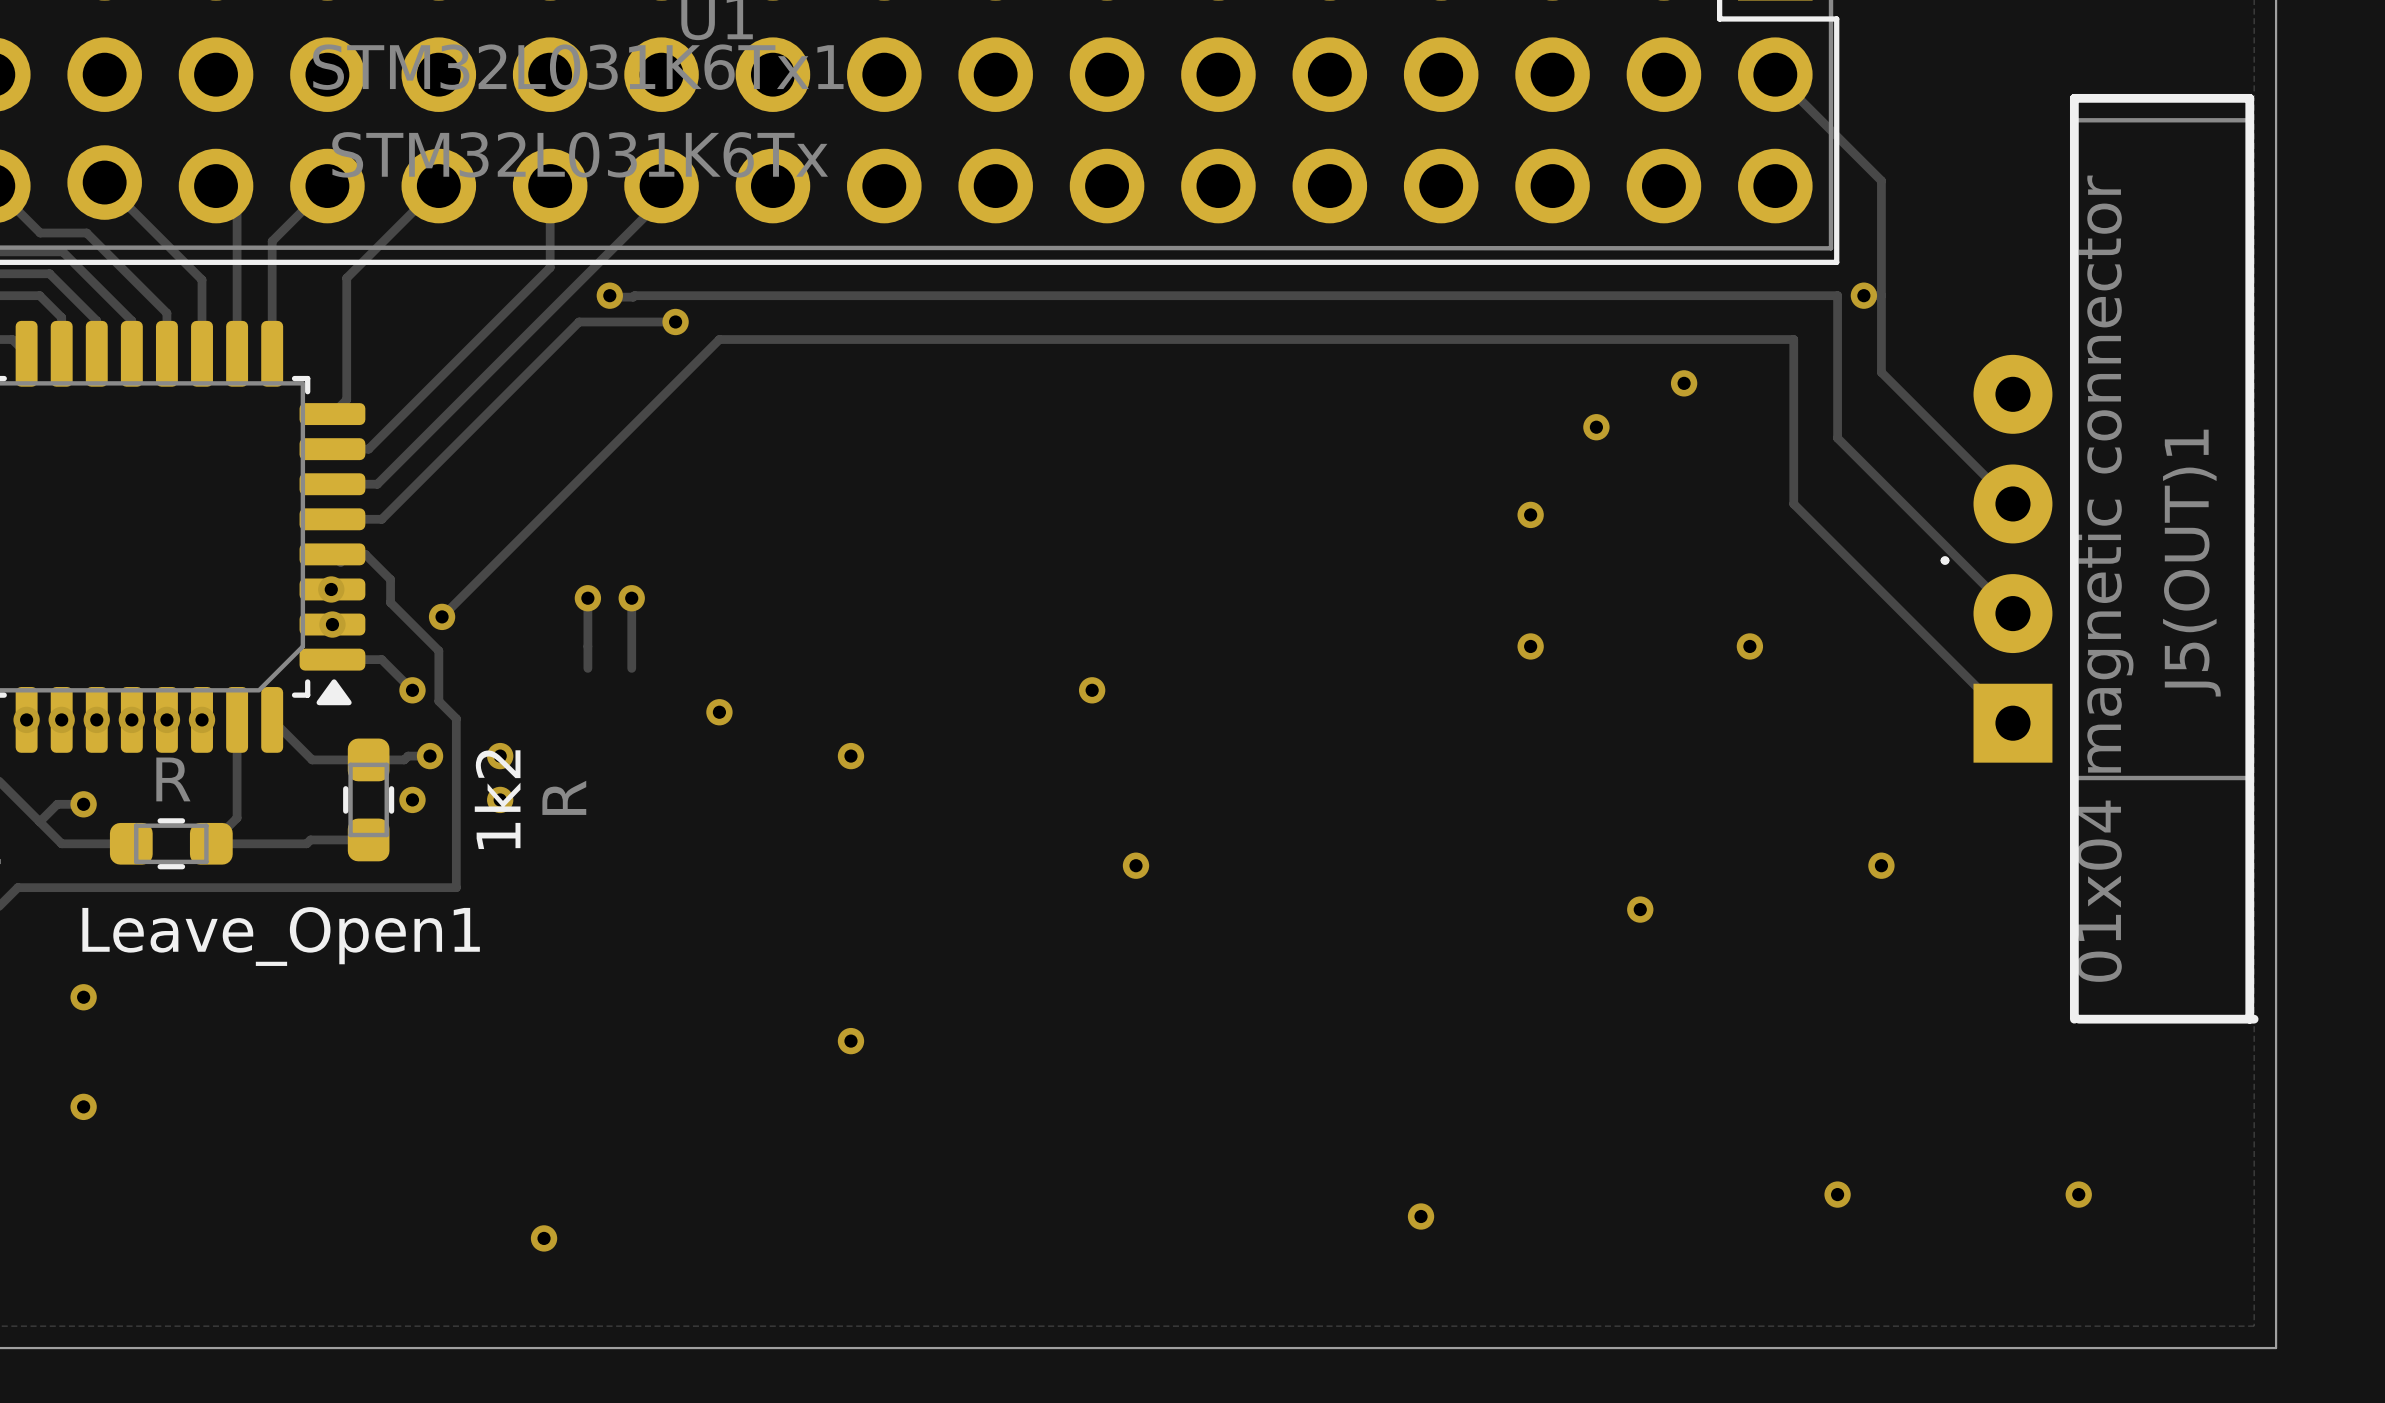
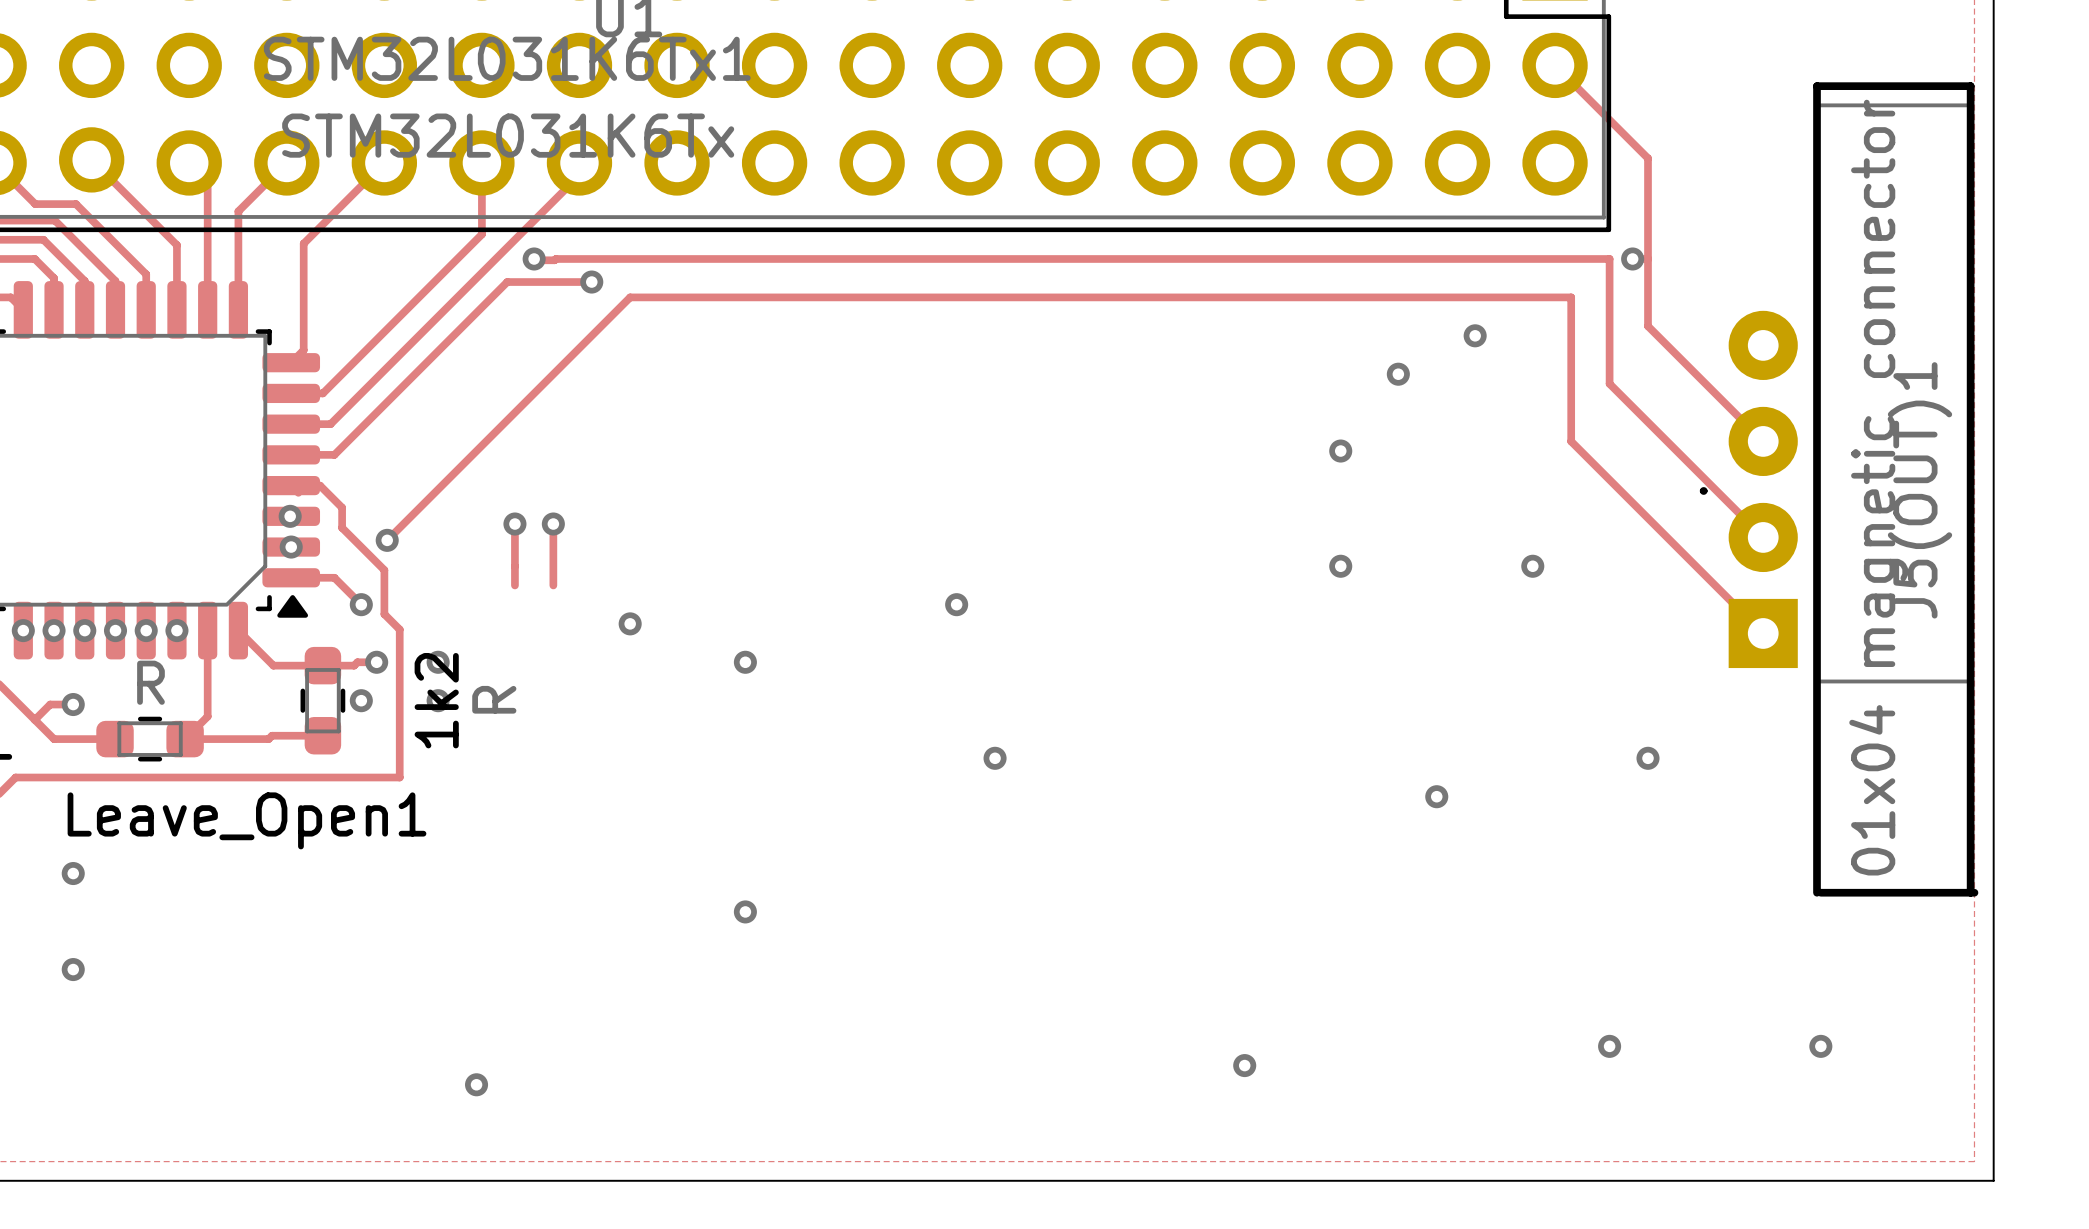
J5(OUT)1 value position: 01x04 magnetic connector (2104, 578) -> 01x04 magnetic connector (1878, 487)

